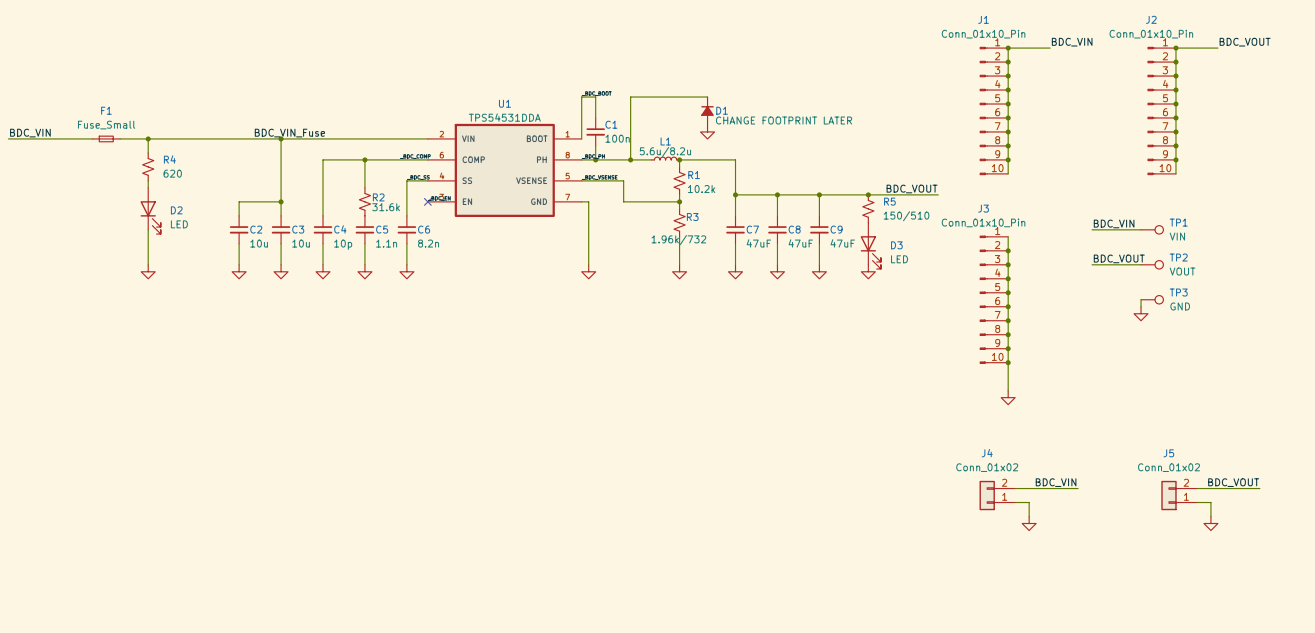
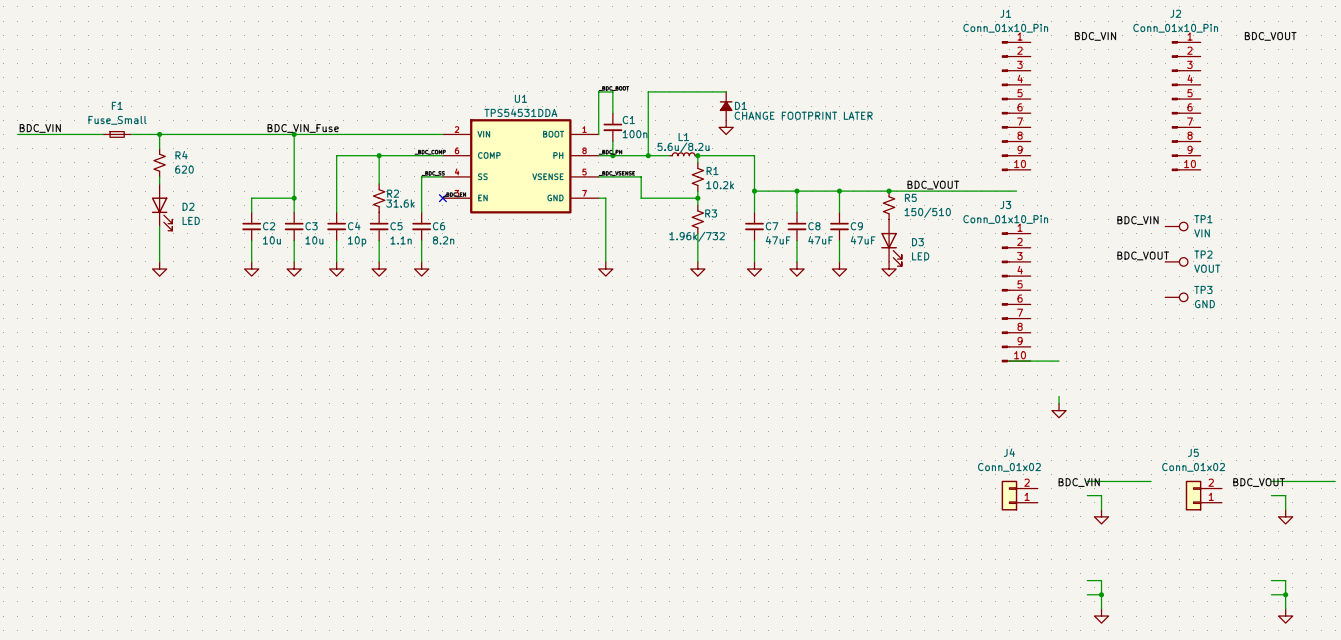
junction: (1008, 48) -> none
wire: (1050, 48) (1008, 48) (1008, 173) -> none
junction: (1175, 48) -> none
wire: (1217, 48) (1175, 48) (1175, 173) -> none
junction: (1008, 62) -> none
junction: (1175, 62) -> none
junction: (1008, 76) -> none
junction: (1175, 76) -> none
junction: (1008, 90) -> none
junction: (1175, 90) -> none
junction: (1008, 104) -> none
junction: (1175, 104) -> none
junction: (1008, 117) -> none
junction: (1175, 117) -> none
junction: (1008, 131) -> none
junction: (1175, 131) -> none
junction: (1008, 145) -> none
junction: (1175, 145) -> none
junction: (1008, 159) -> none
junction: (1175, 159) -> none
wire: none -> (959, 191) (1016, 191)
wire: (1092, 229) (1141, 229) -> none
wire: (1008, 236) (1008, 390) -> none
junction: (1008, 250) -> none
junction: (1008, 264) -> none
wire: (1092, 264) (1141, 264) -> none
junction: (1008, 278) -> none
junction: (1008, 292) -> none
wire: (1141, 299) (1141, 306) -> none
junction: (1008, 306) -> none
power symbol: (1141, 313) -> none
junction: (1008, 320) -> none
junction: (1008, 334) -> none
junction: (1008, 348) -> none
wire: none -> (1009, 361) (1059, 361)
junction: (1008, 362) -> none
power symbol position: (1008, 397) -> (1059, 410)
wire: none -> (1059, 396) (1059, 403)
wire: (1015, 488) (1078, 488) -> (1087, 481) (1151, 481)
wire: (1196, 488) (1259, 488) -> (1271, 481) (1335, 481)
wire: (1015, 502) (1029, 502) (1029, 516) -> (1087, 495) (1101, 495) (1101, 509)
wire: (1196, 502) (1210, 502) (1210, 516) -> (1271, 495) (1285, 495) (1285, 509)
power symbol position: (1029, 523) -> (1101, 516)
power symbol position: (1210, 523) -> (1285, 516)
wire: none -> (1087, 580) (1101, 580) (1101, 608)
wire: none -> (1271, 580) (1285, 580) (1285, 608)
wire: none -> (1087, 594) (1101, 594)
junction: none -> (1101, 594)
wire: none -> (1271, 594) (1285, 594)
junction: none -> (1285, 594)
power symbol: none -> (1101, 616)
power symbol: none -> (1285, 616)

